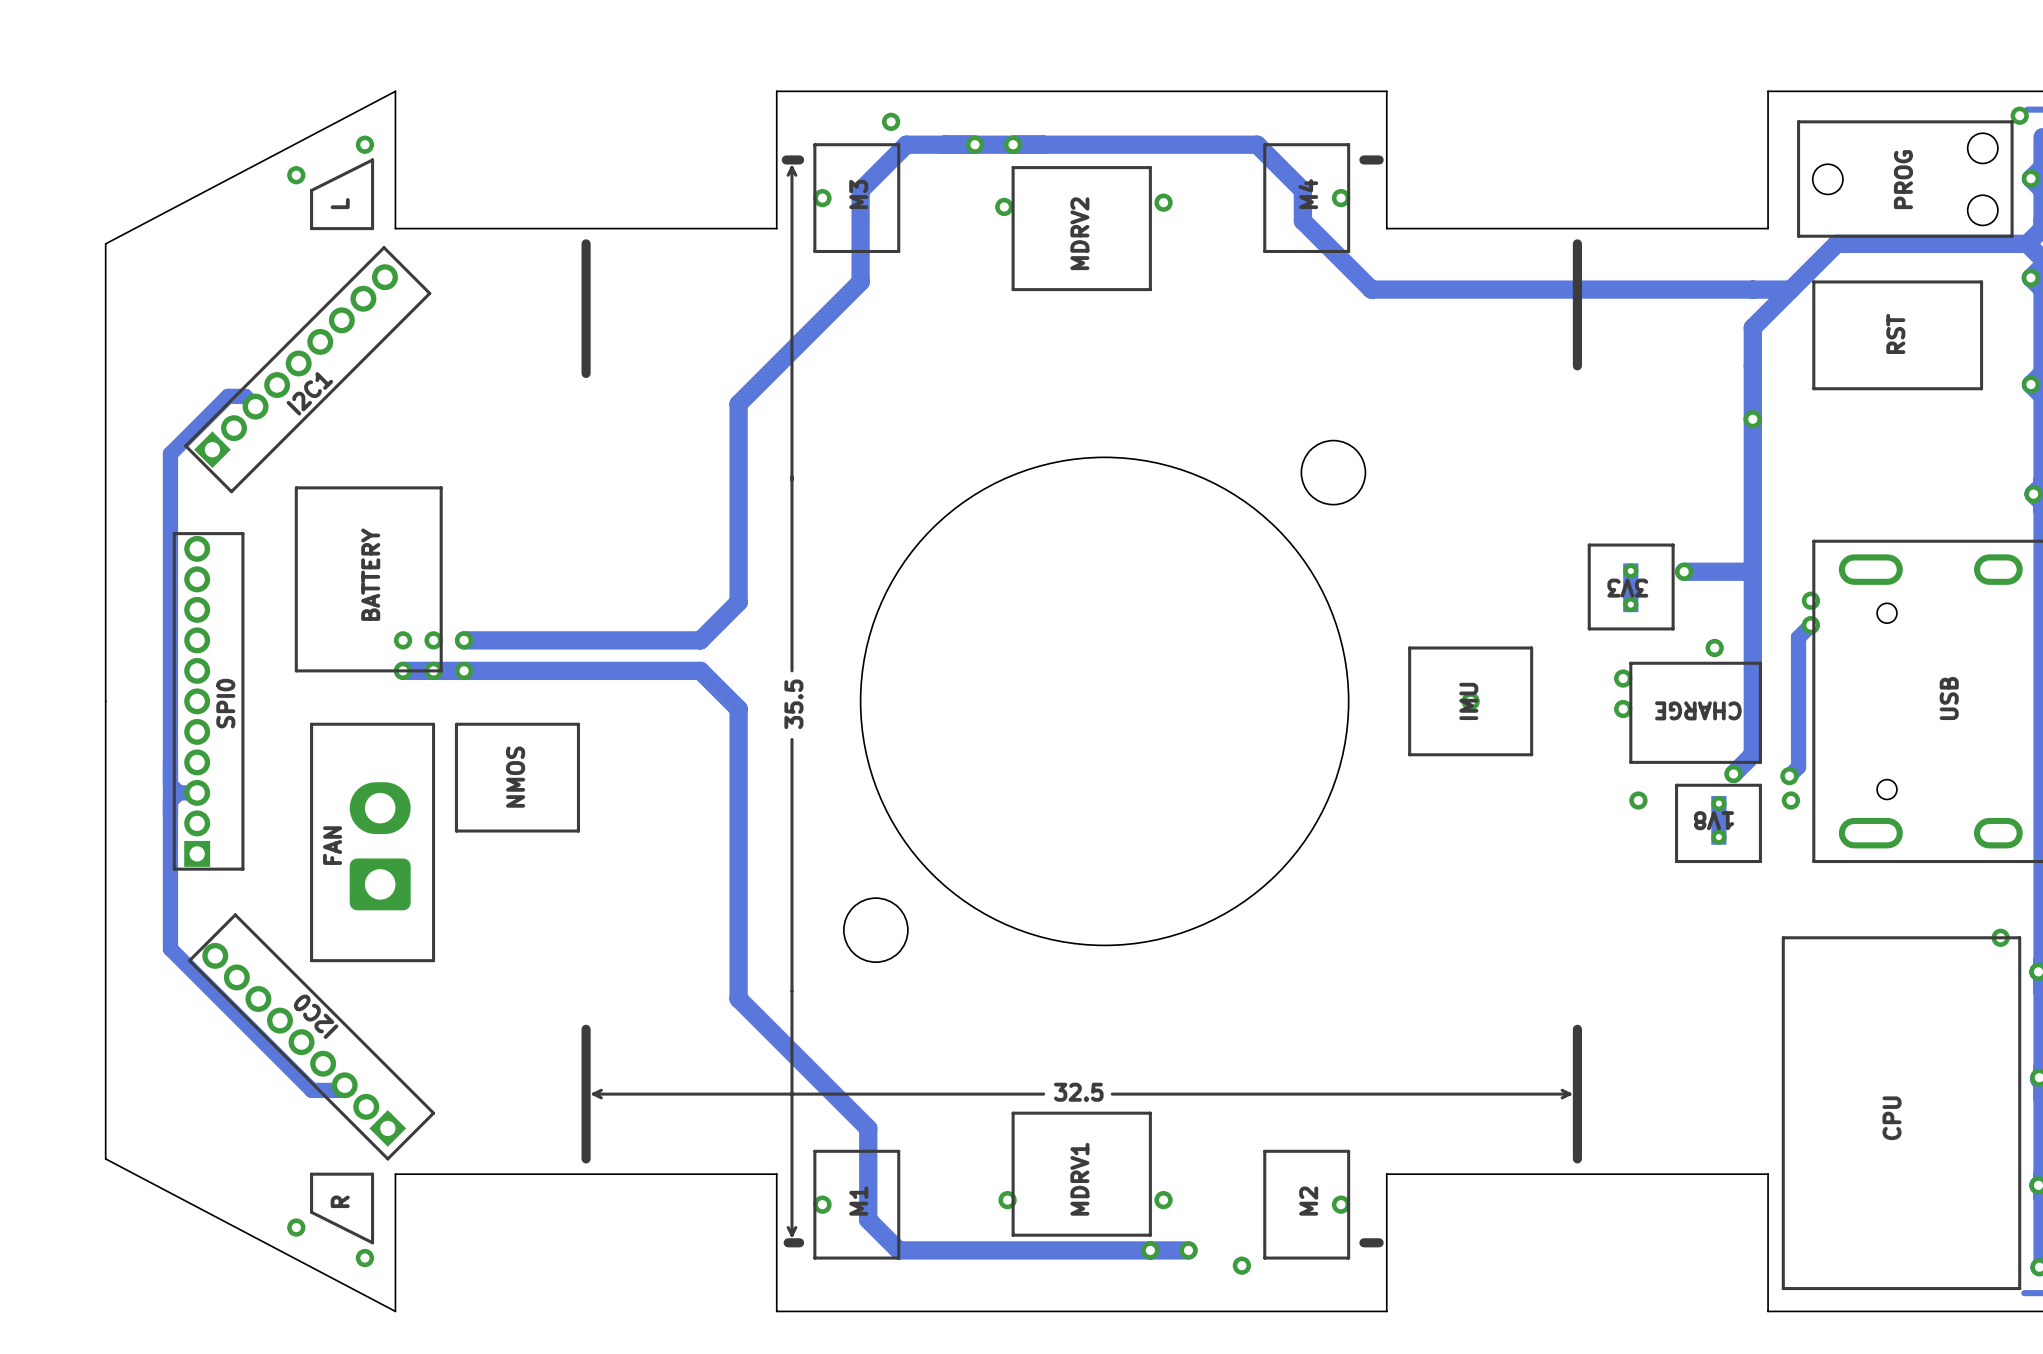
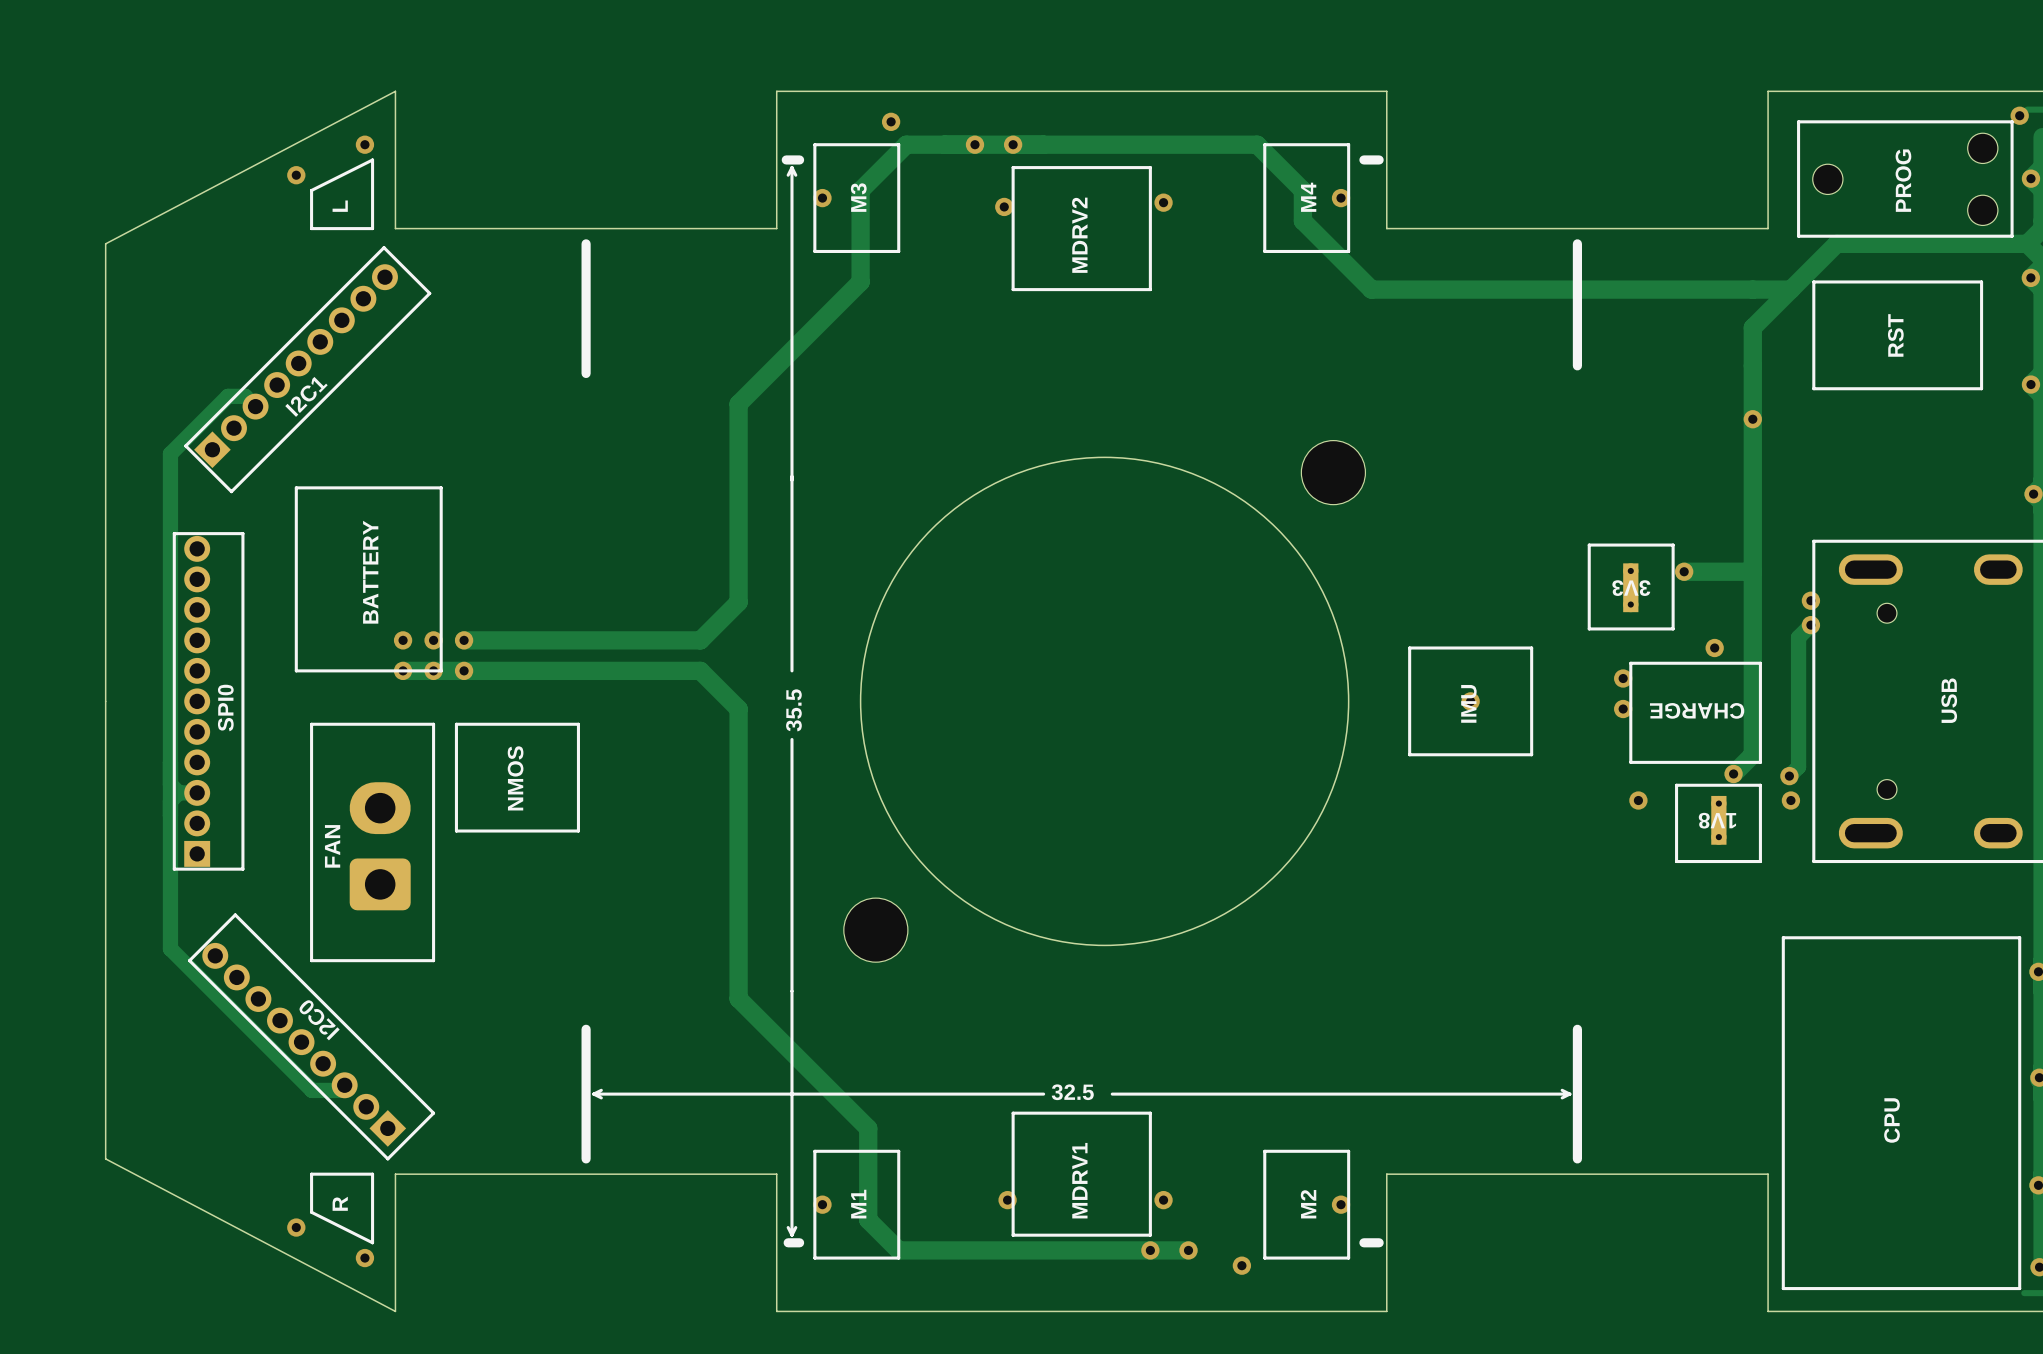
via: (2000, 937) -> none

